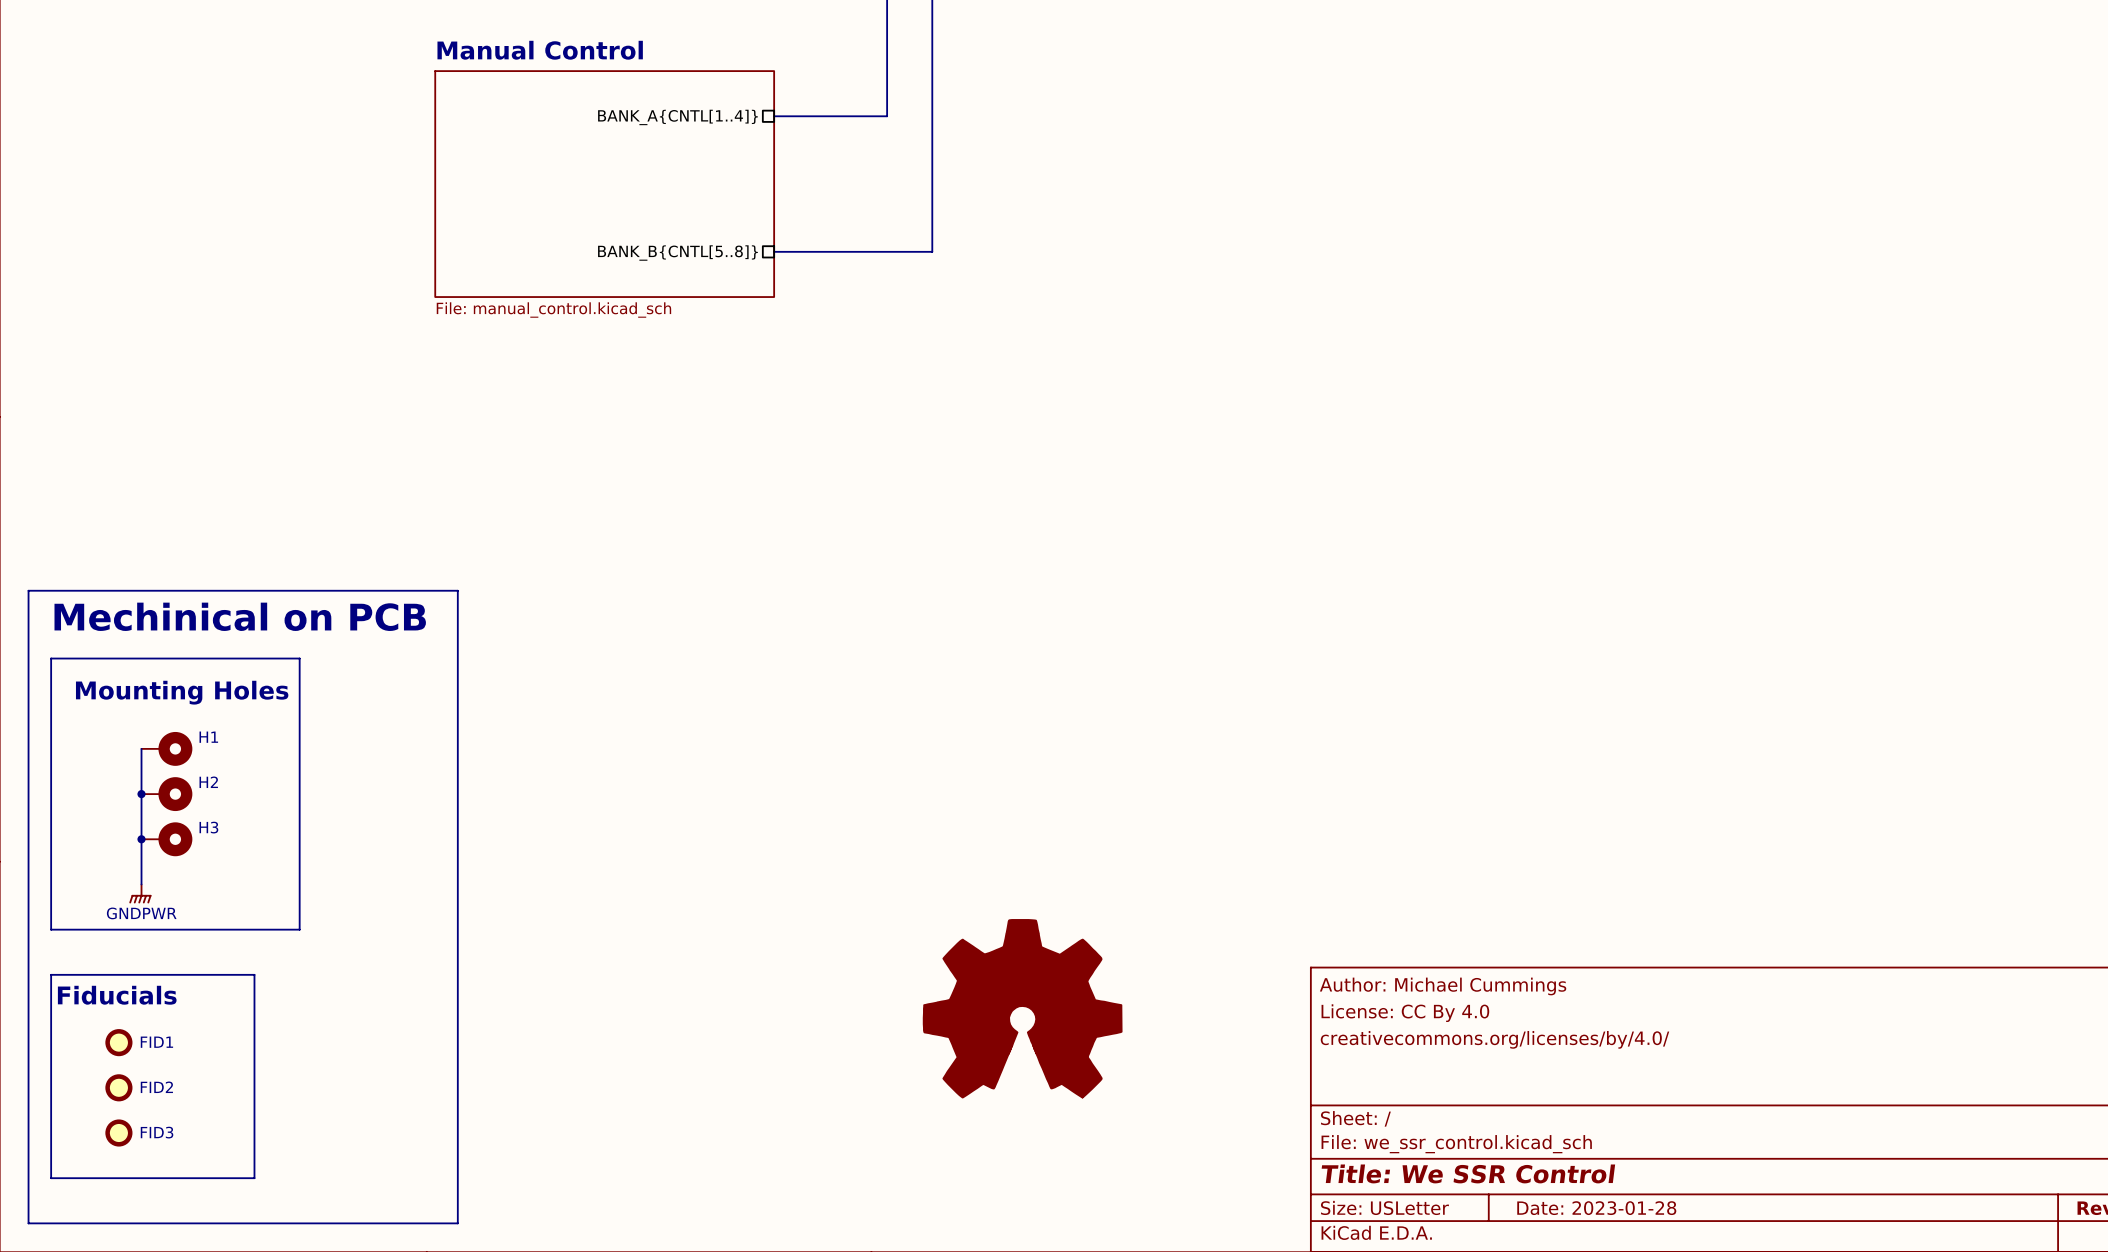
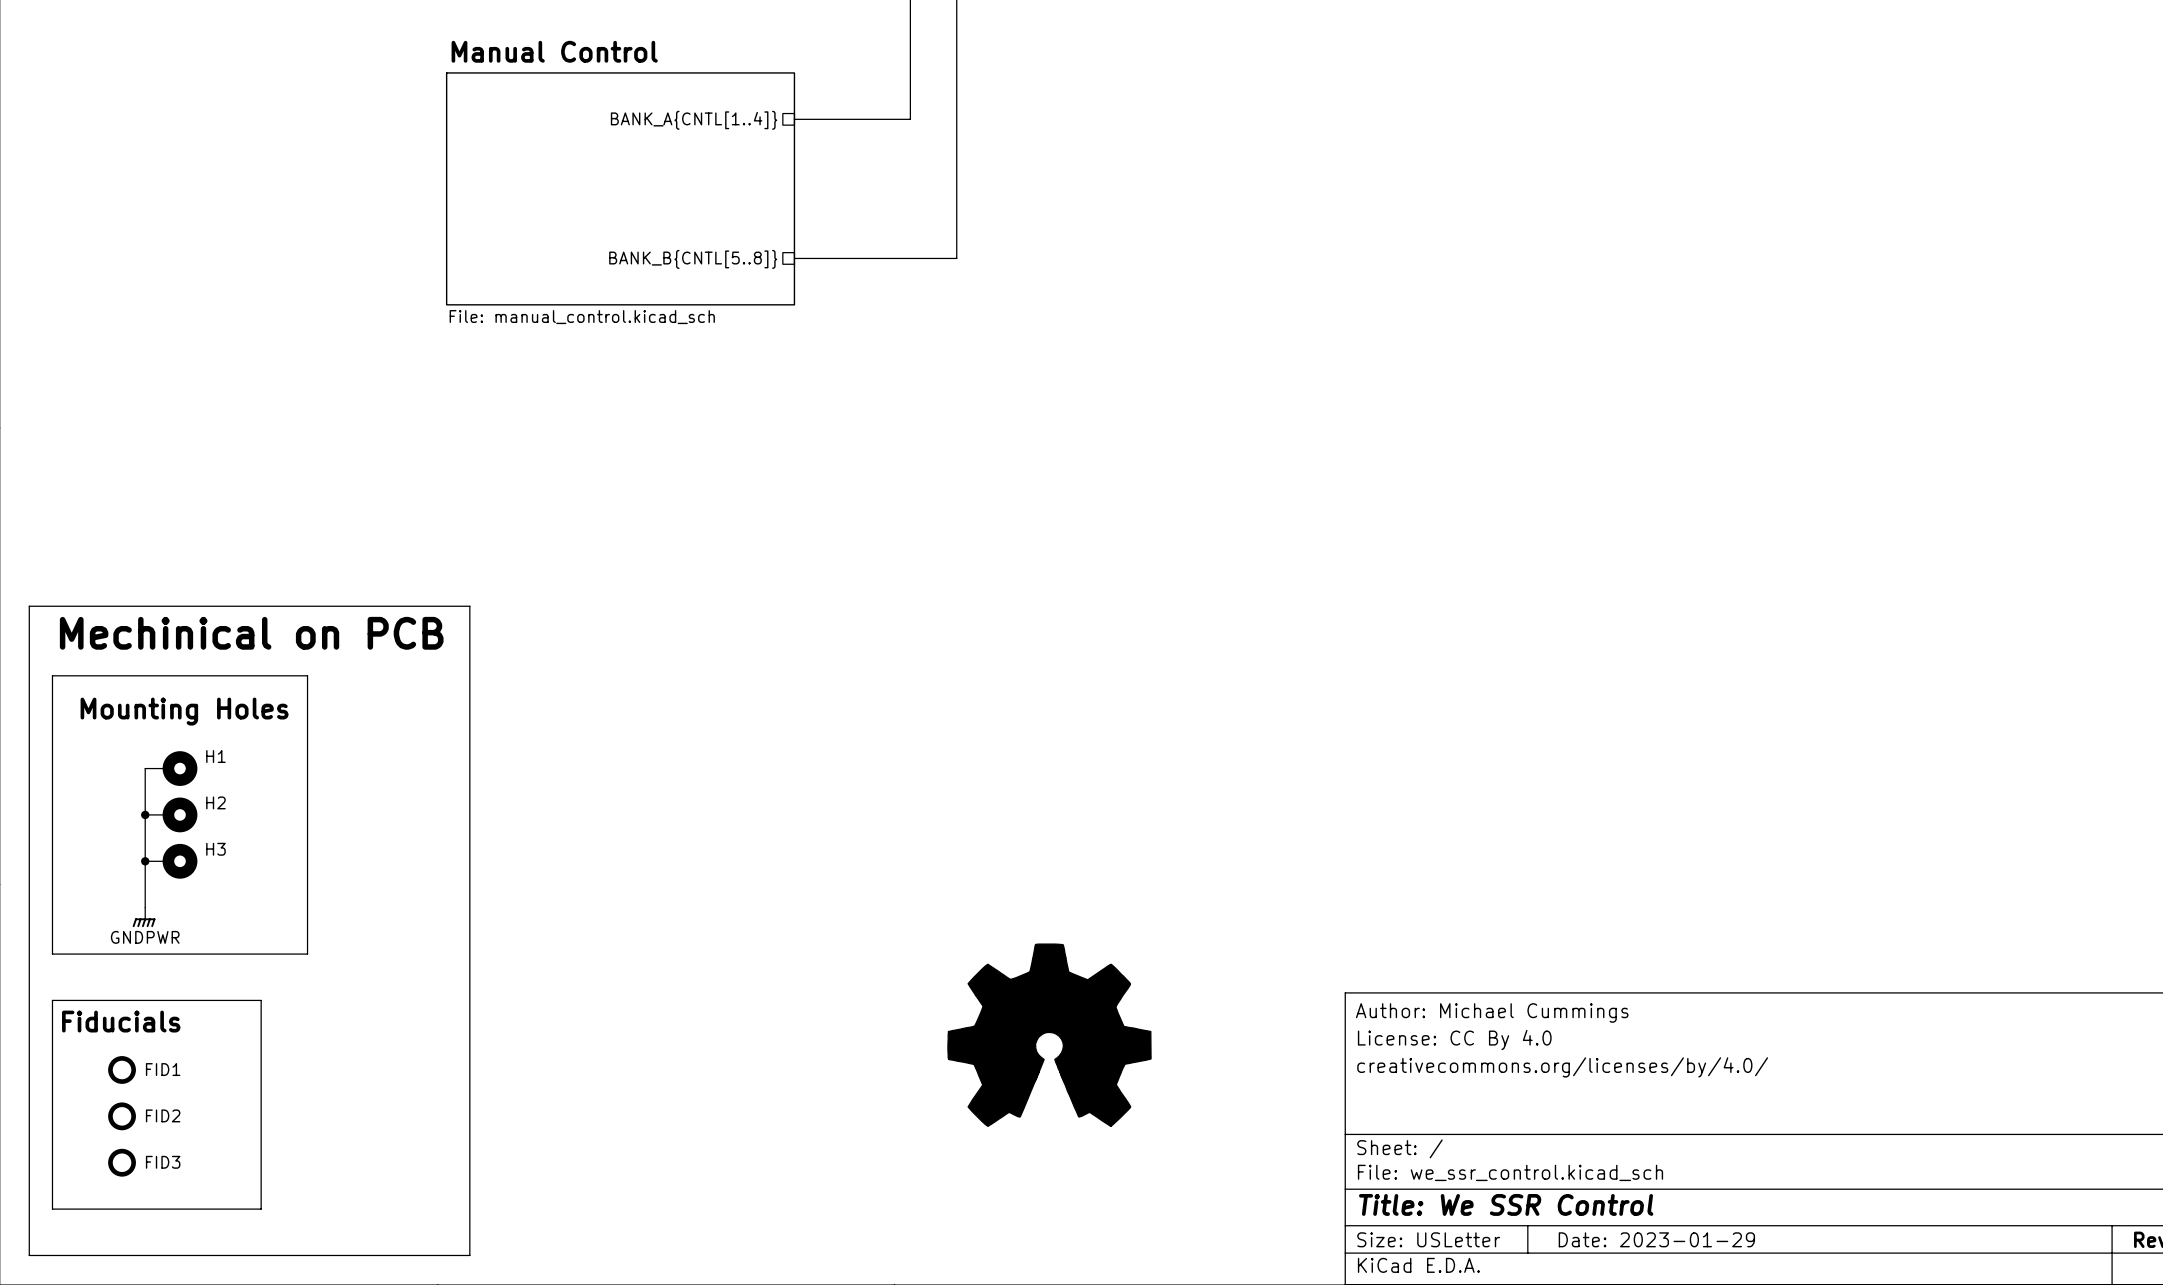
title block: Date: 2023-01-28 (1596, 1208) -> Date: 2023-01-29 (1656, 1239)

